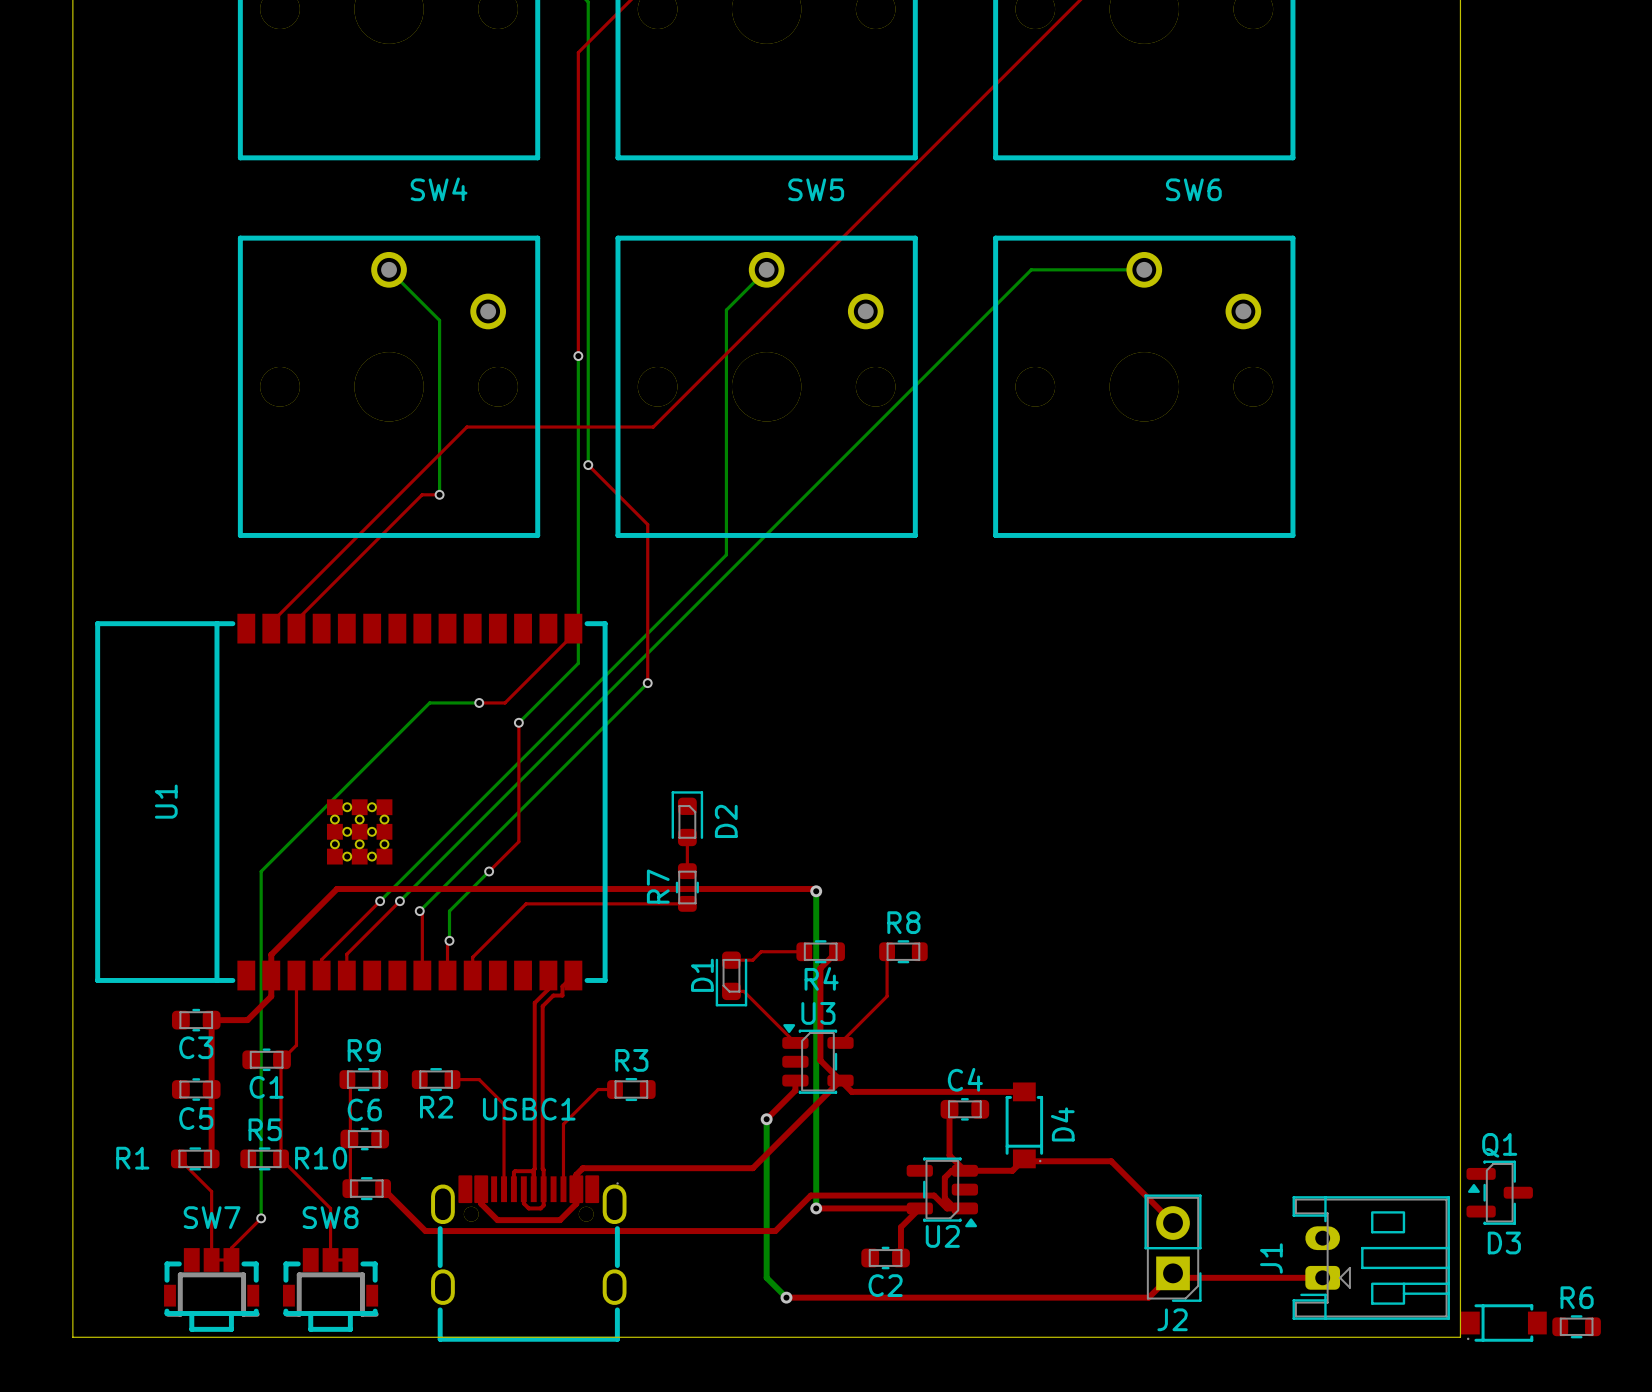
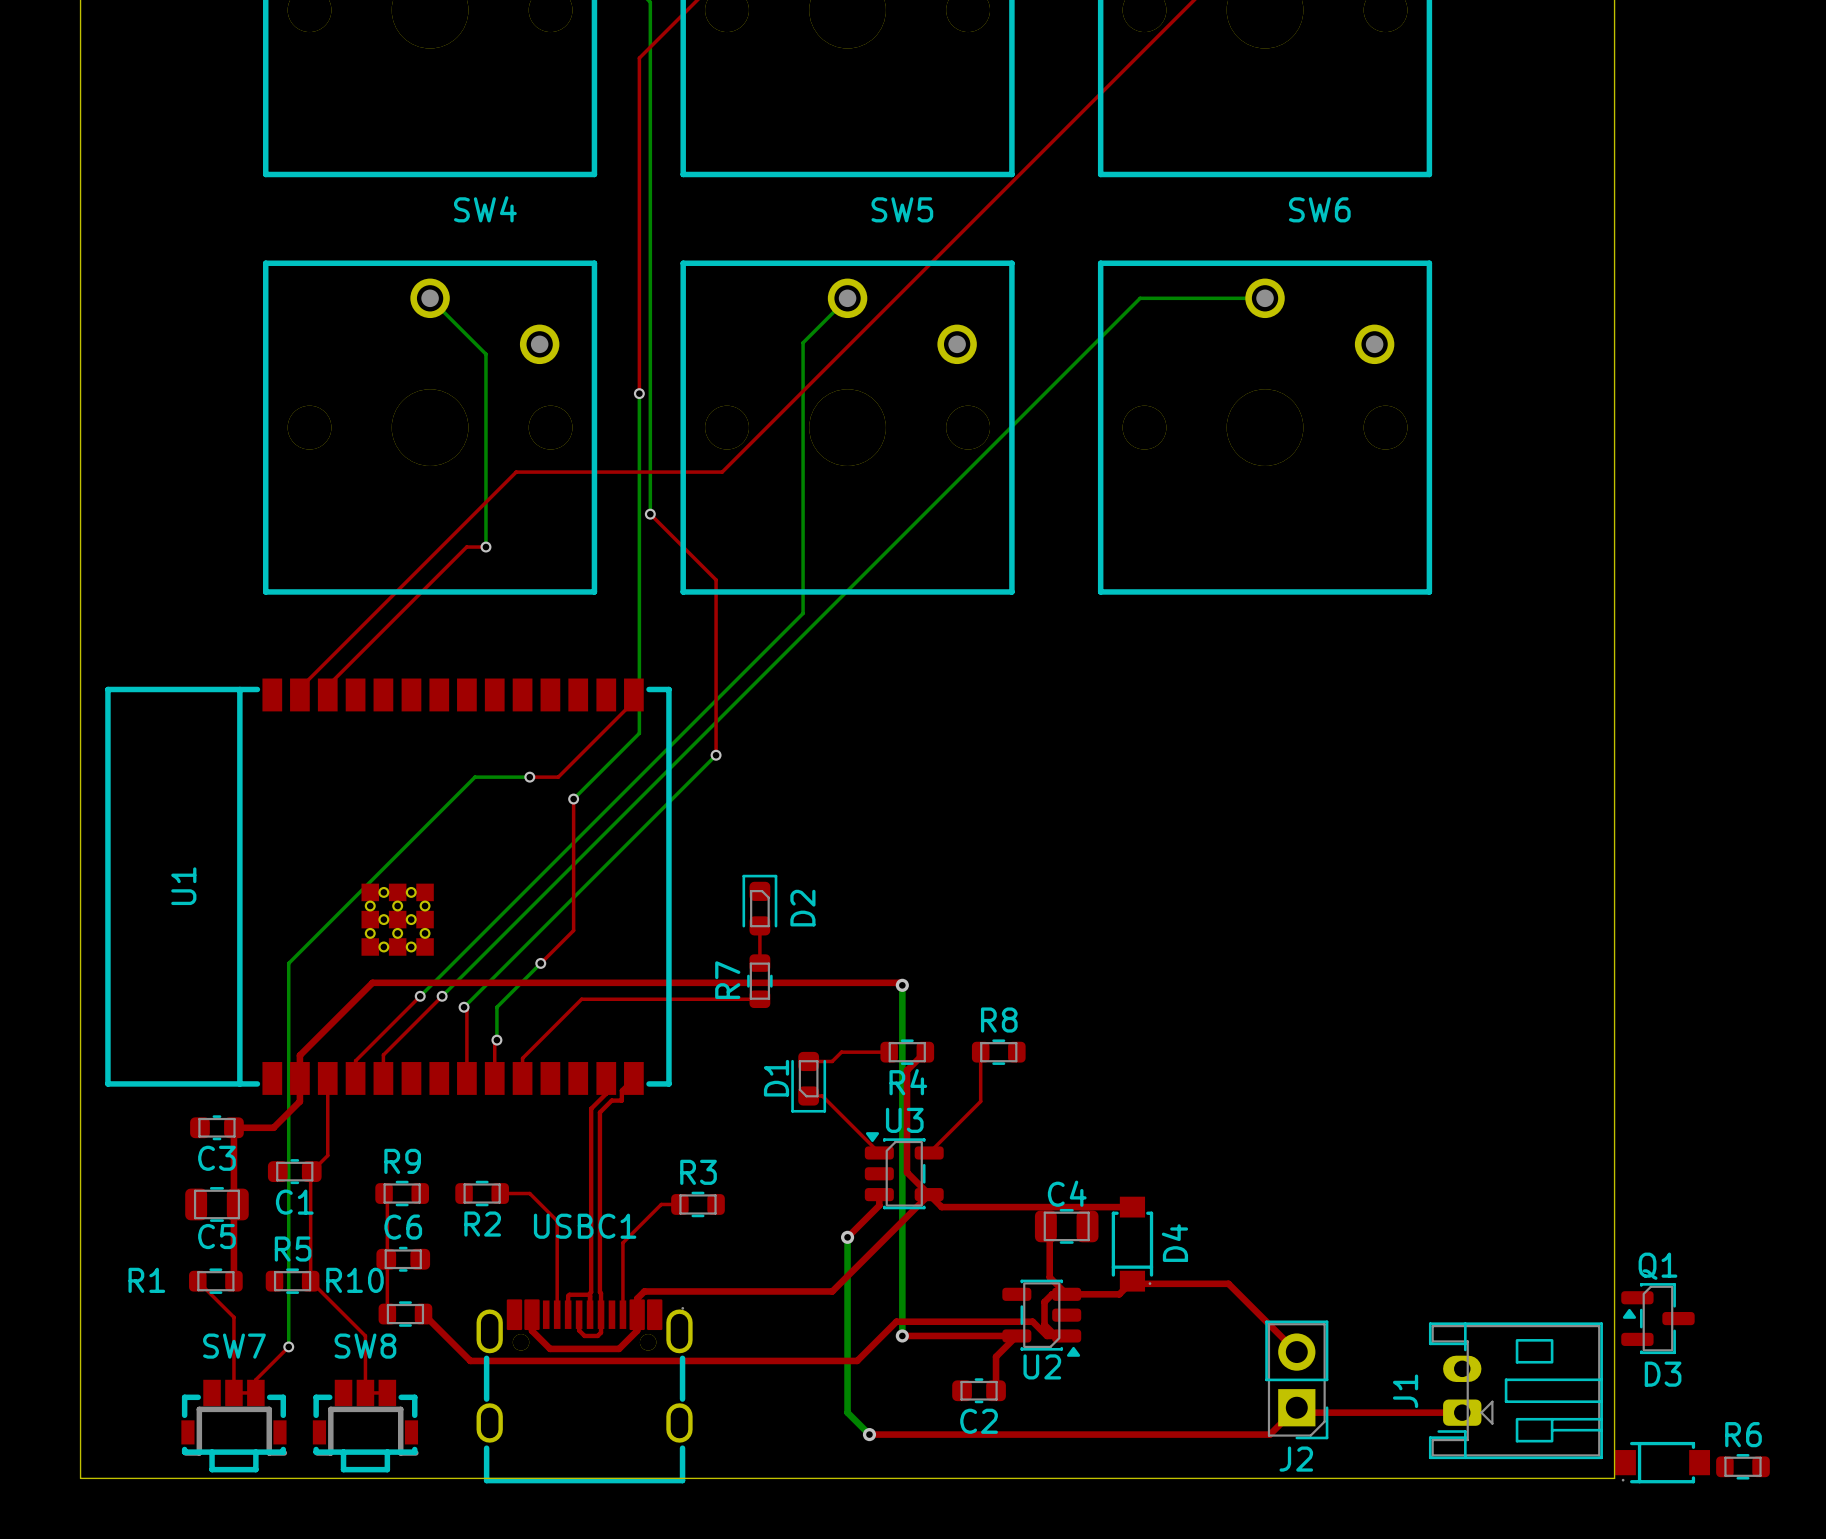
C5 footprint: [171, 1078, 221, 1101] -> [185, 1187, 249, 1222]
C4 footprint: [940, 1098, 990, 1121] -> [1034, 1208, 1099, 1244]

